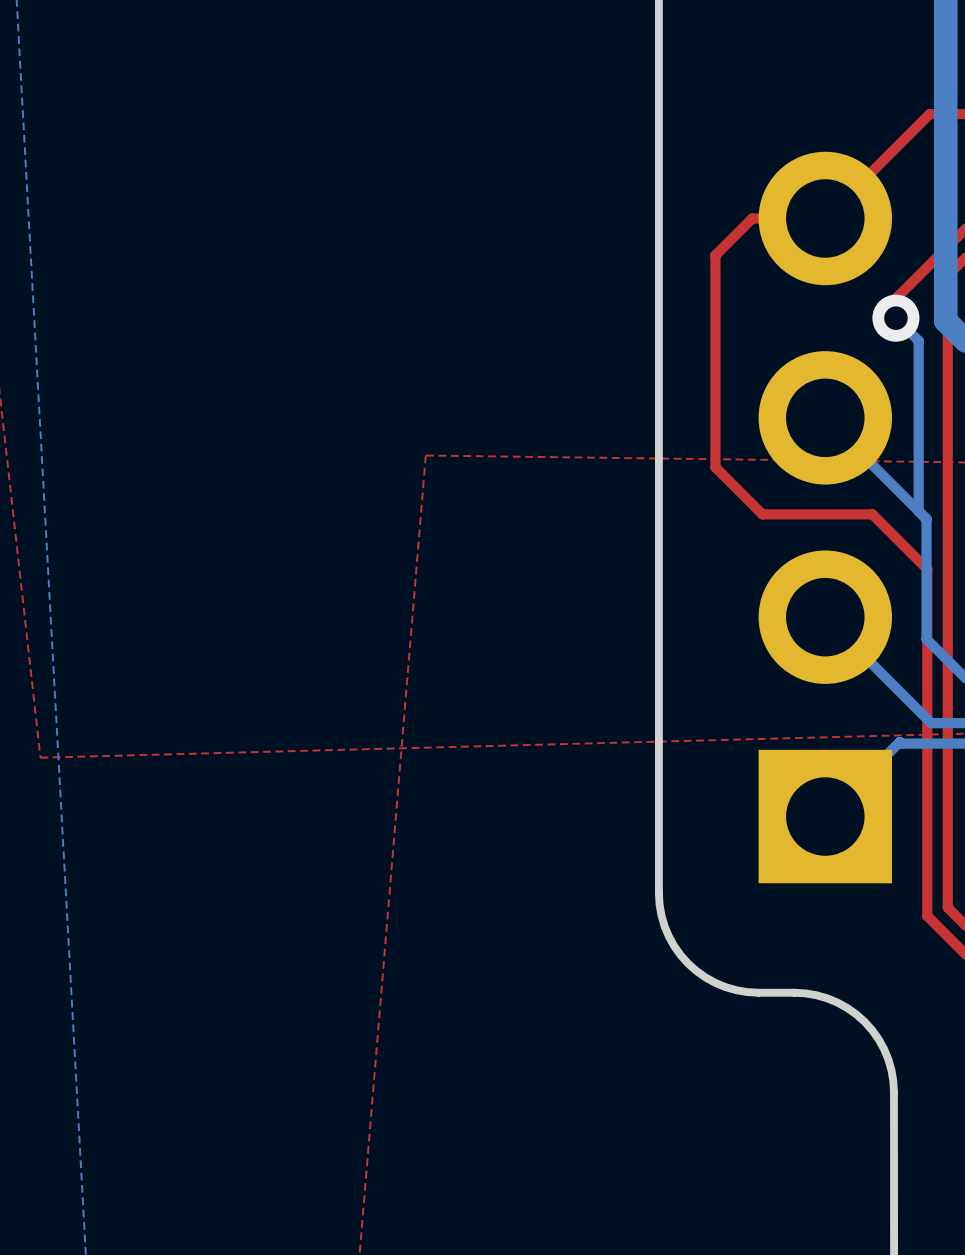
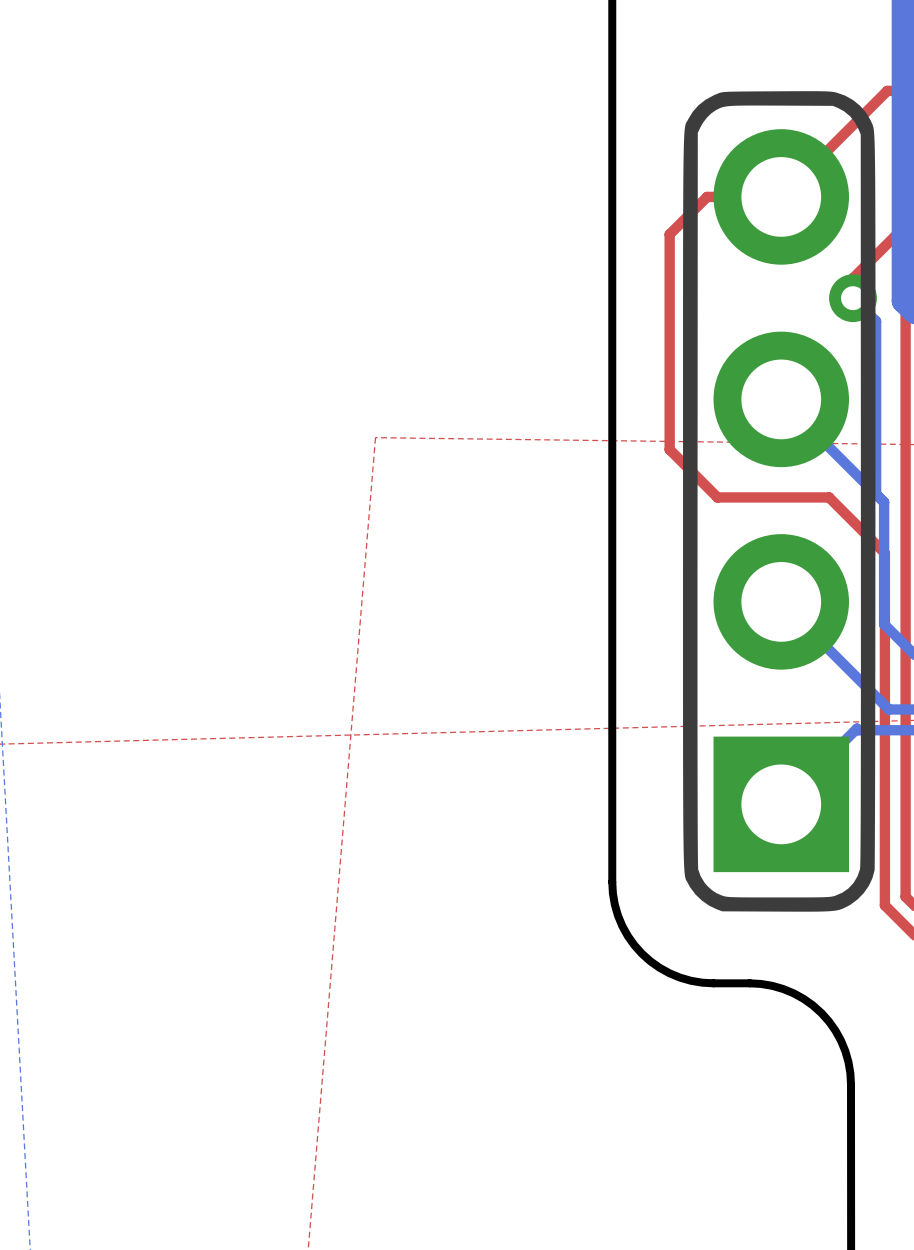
drawing: none -> [683, 91, 876, 912]

